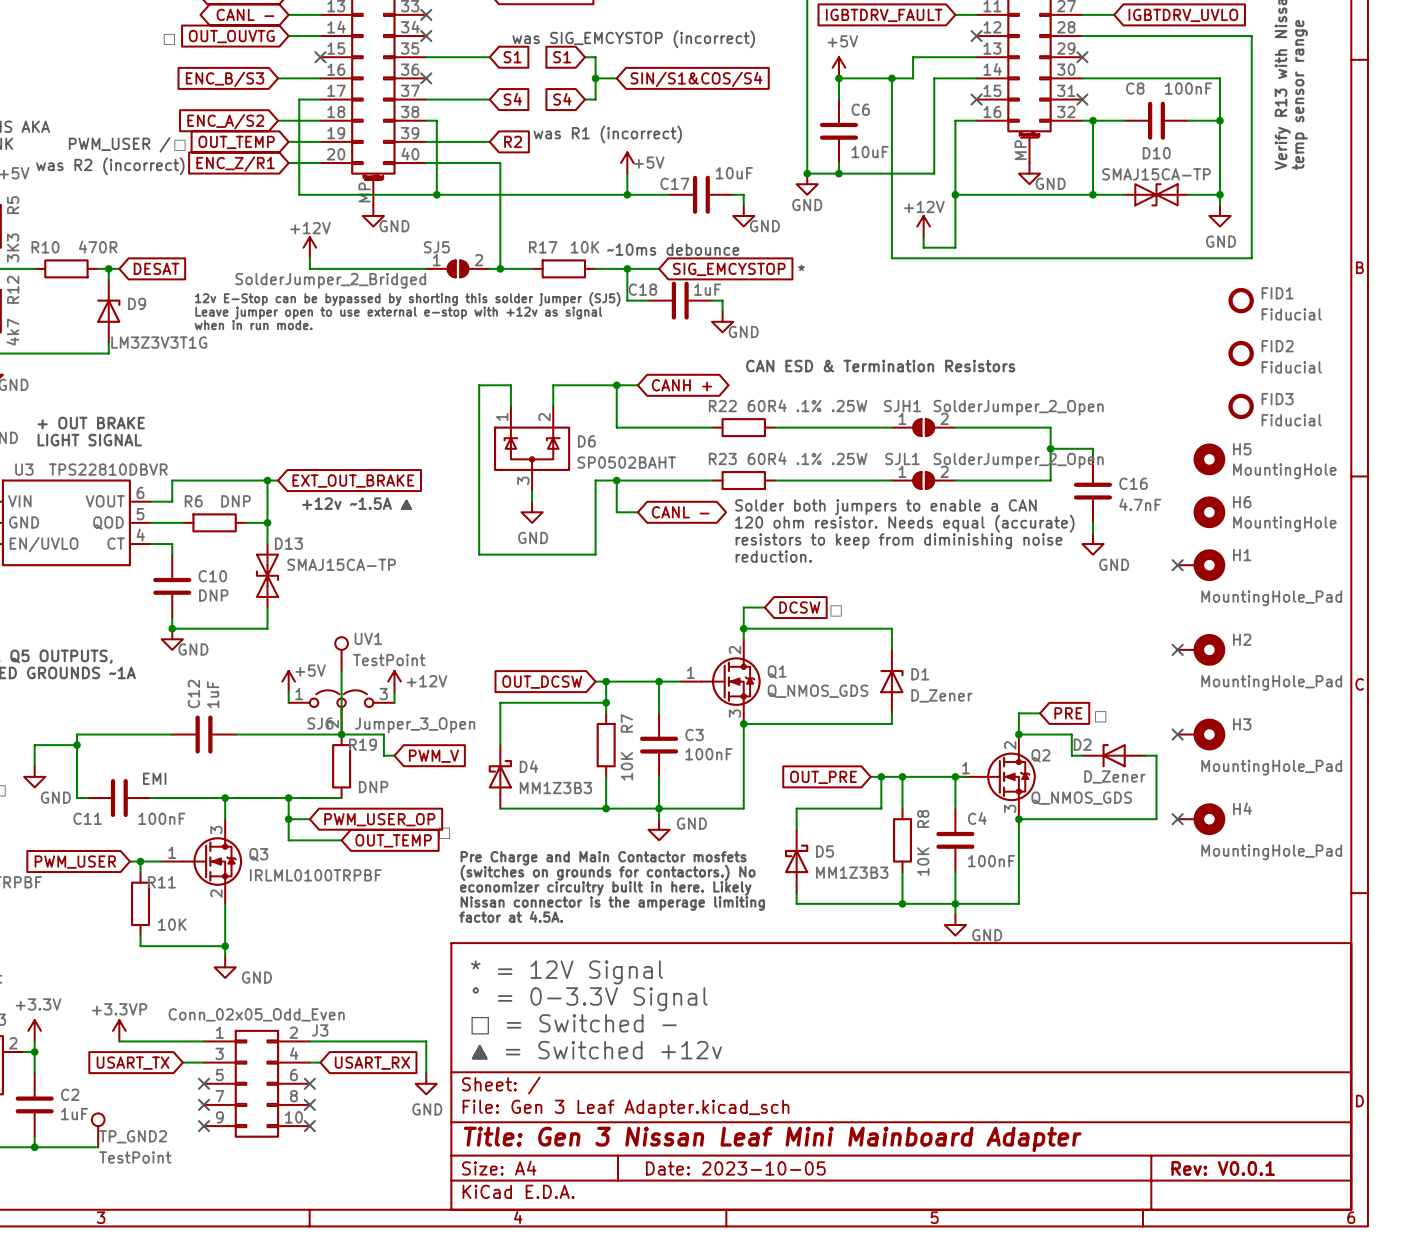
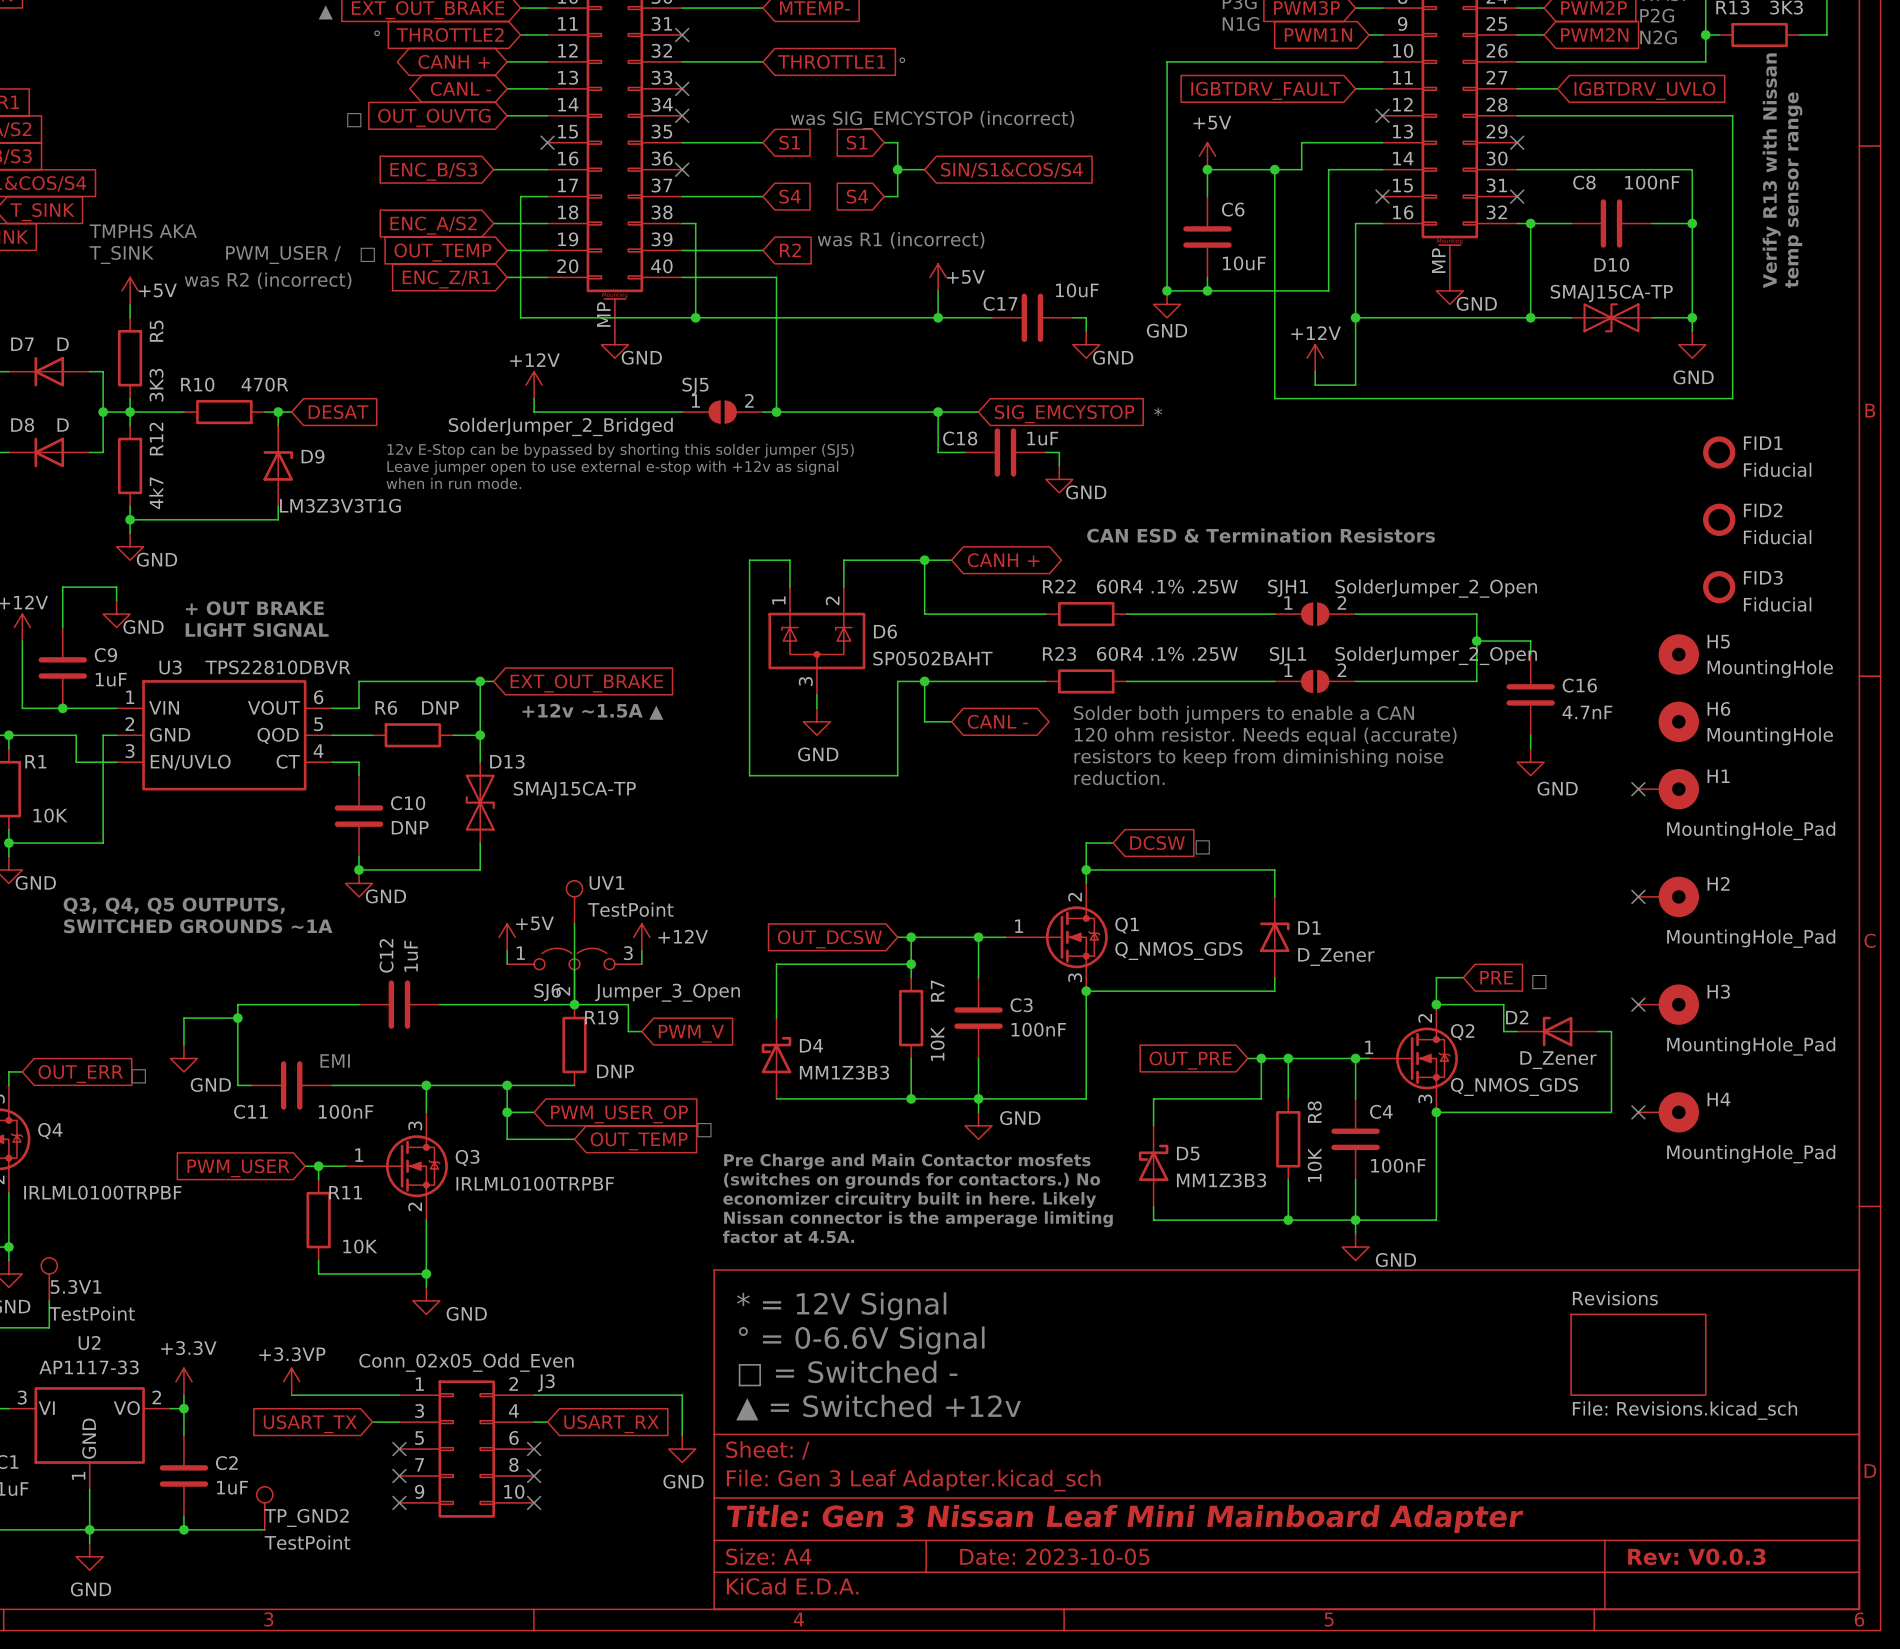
text: ~10ms debounce (673, 249) -> none
wire: none -> (816, 412) (897, 412)
R17: 10K (563, 268) -> none
text: ° = 0-3.3V Signal (590, 999) -> ° = 0-6.6V Signal (861, 1340)
sheet Revisions: none -> File: Revisions.kicad_sch (1638, 1354)
title block: Rev: V0.0.1 (1223, 1168) -> Rev: V0.0.3 (1696, 1556)

